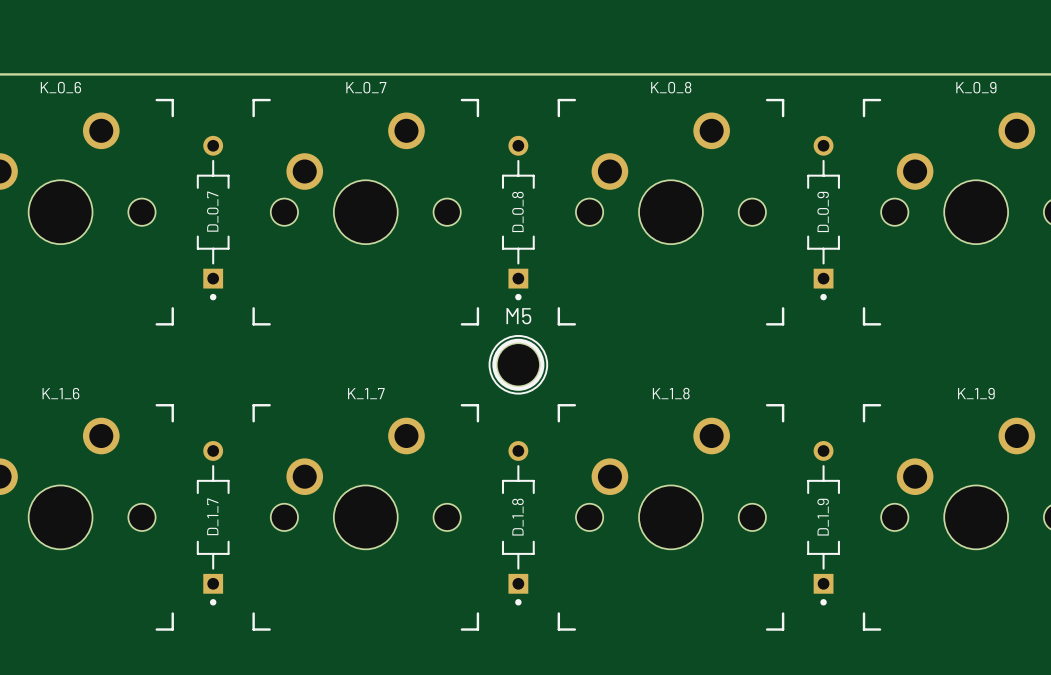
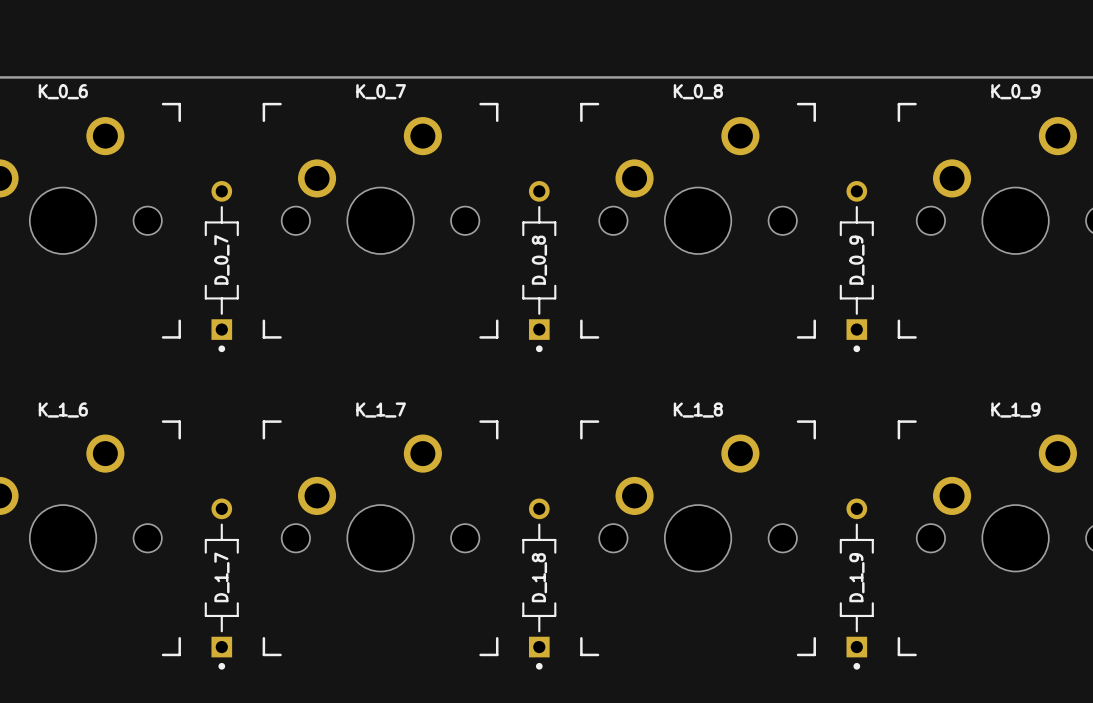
D_0_7 position: (213, 218) -> (221, 266)
D_0_8 position: (518, 218) -> (539, 266)
D_0_9 position: (823, 218) -> (856, 266)
drawing: [488, 334, 549, 395] -> none
M5: (518, 364) -> none
D_1_7 position: (213, 523) -> (221, 584)
D_1_8 position: (518, 523) -> (539, 584)
D_1_9 position: (823, 523) -> (856, 584)

